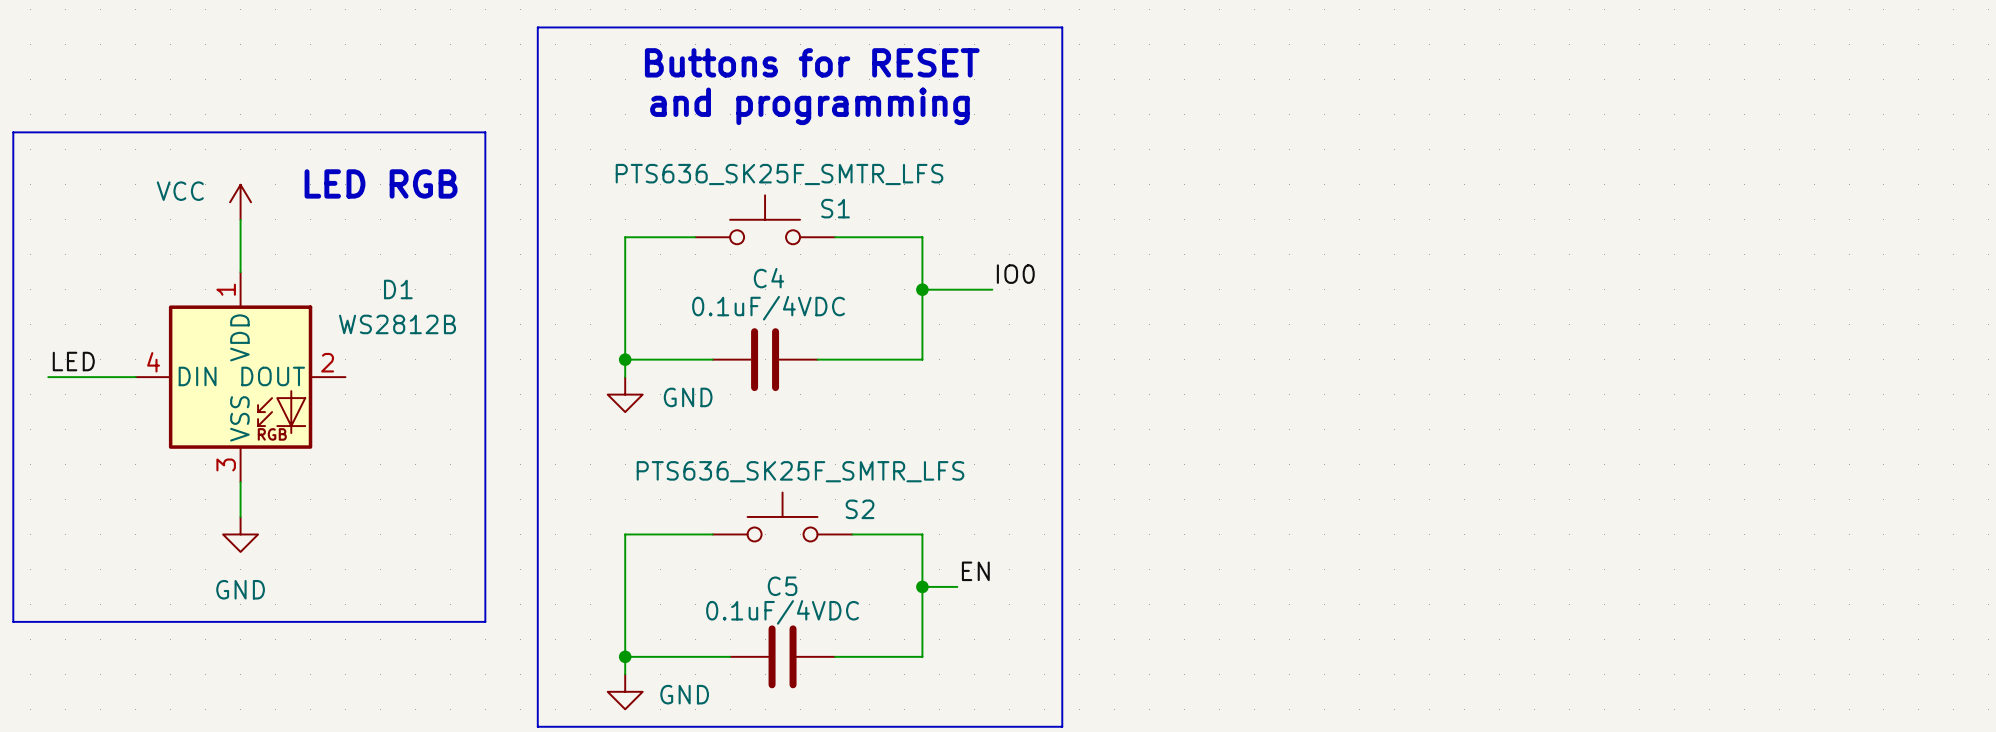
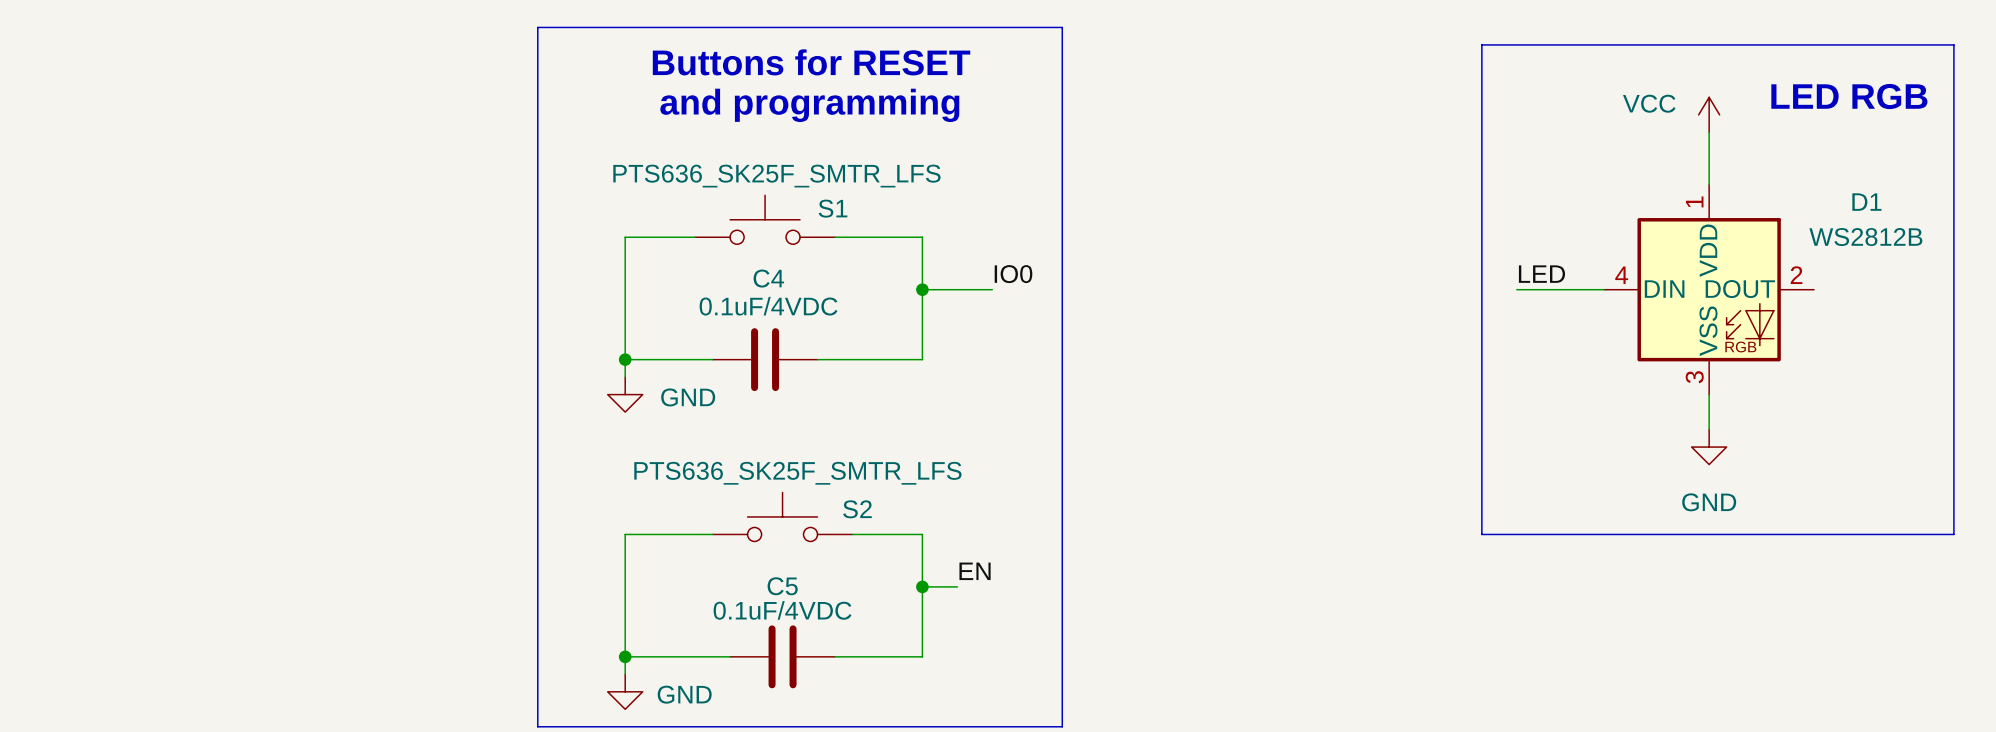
line: none -> (1481, 44) (1953, 44) (1953, 534) (1481, 534) (1481, 44)
text: none -> LED RGB (1849, 96)
power symbol: none -> VCC (1709, 114)
line: (13, 132) (485, 132) (485, 621) (13, 621) (13, 132) -> none
wire: none -> (1709, 132) (1709, 184)
text: LED RGB (381, 183) -> none
power symbol: VCC (240, 202) -> none
wire: (240, 219) (240, 272) -> none
label: none -> LED (1541, 274)
wire: none -> (1516, 289) (1604, 289)
label: LED (73, 361) -> none
wire: (48, 377) (135, 377) -> none
D1 position: (240, 377) -> (1709, 289)
wire: none -> (1709, 394) (1709, 429)
power symbol: none -> GND (1709, 447)
wire: (240, 482) (240, 516) -> none
power symbol: GND (240, 534) -> none

